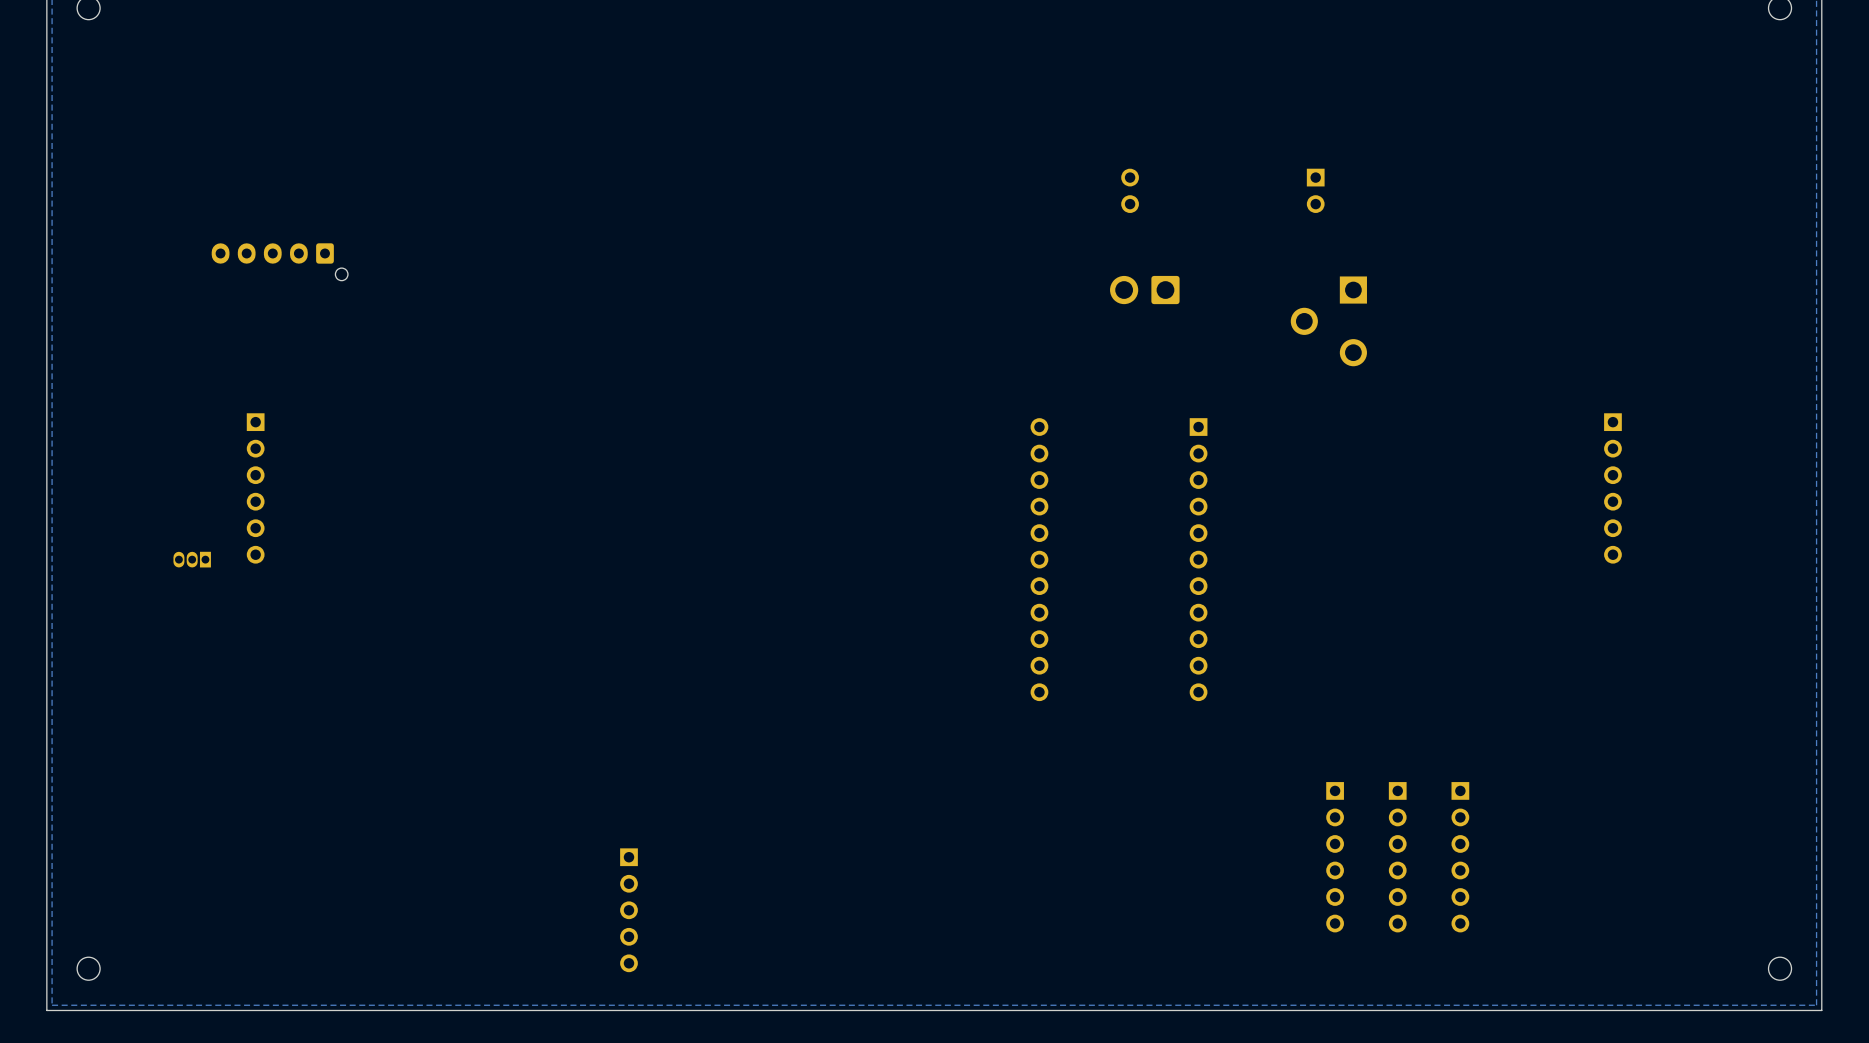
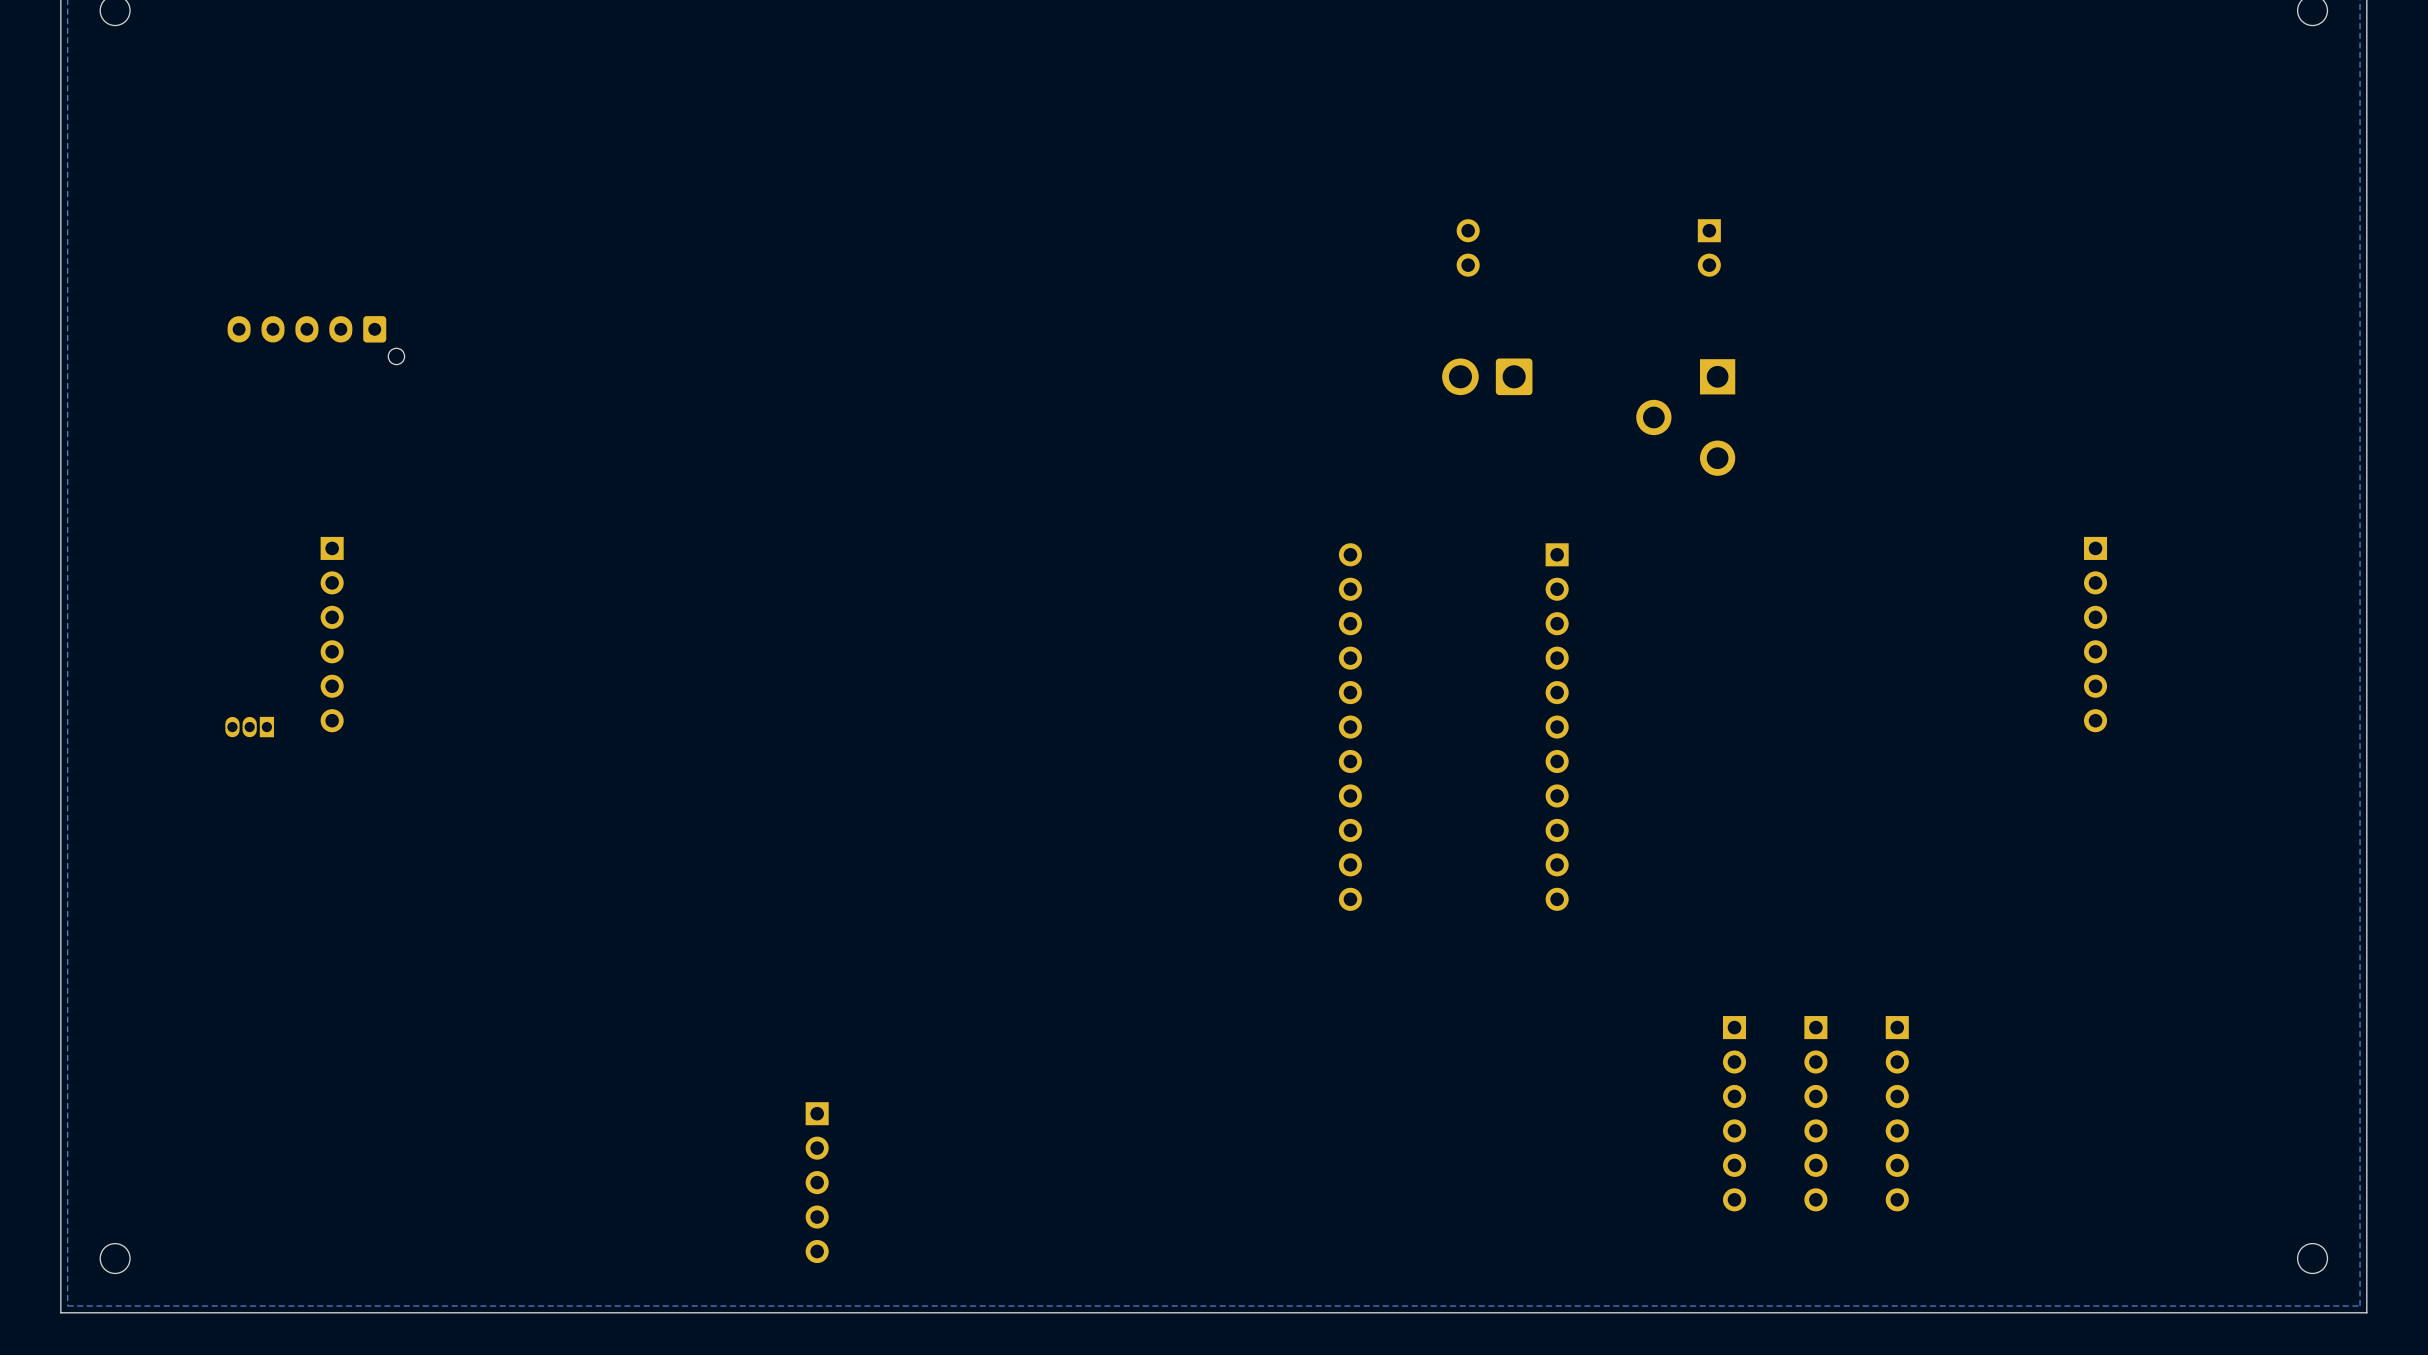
part position: (279, 261) -> (316, 340)
part position: (1328, 321) -> (1685, 417)

